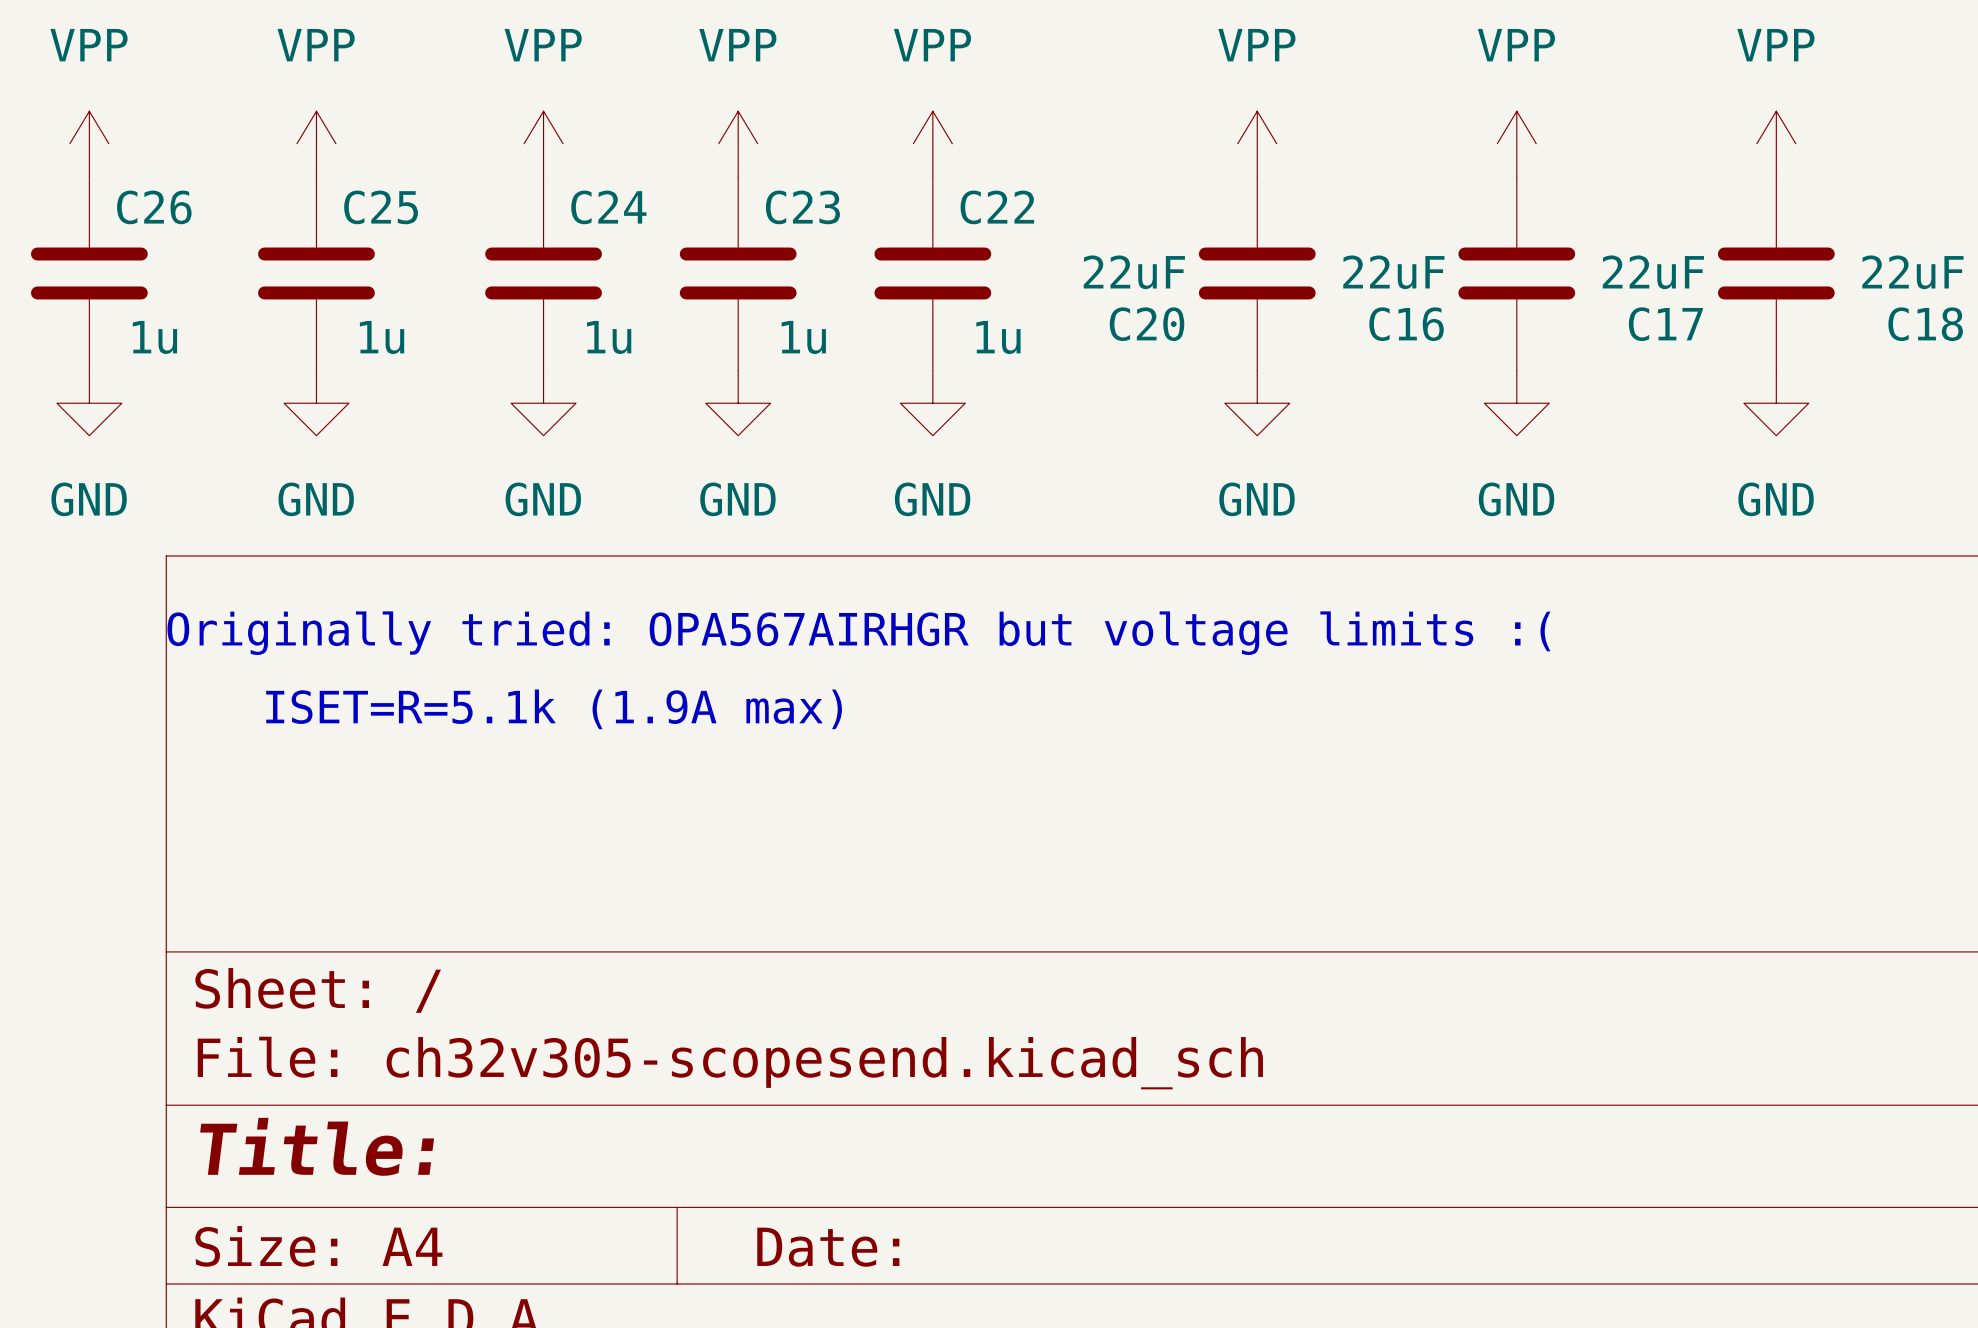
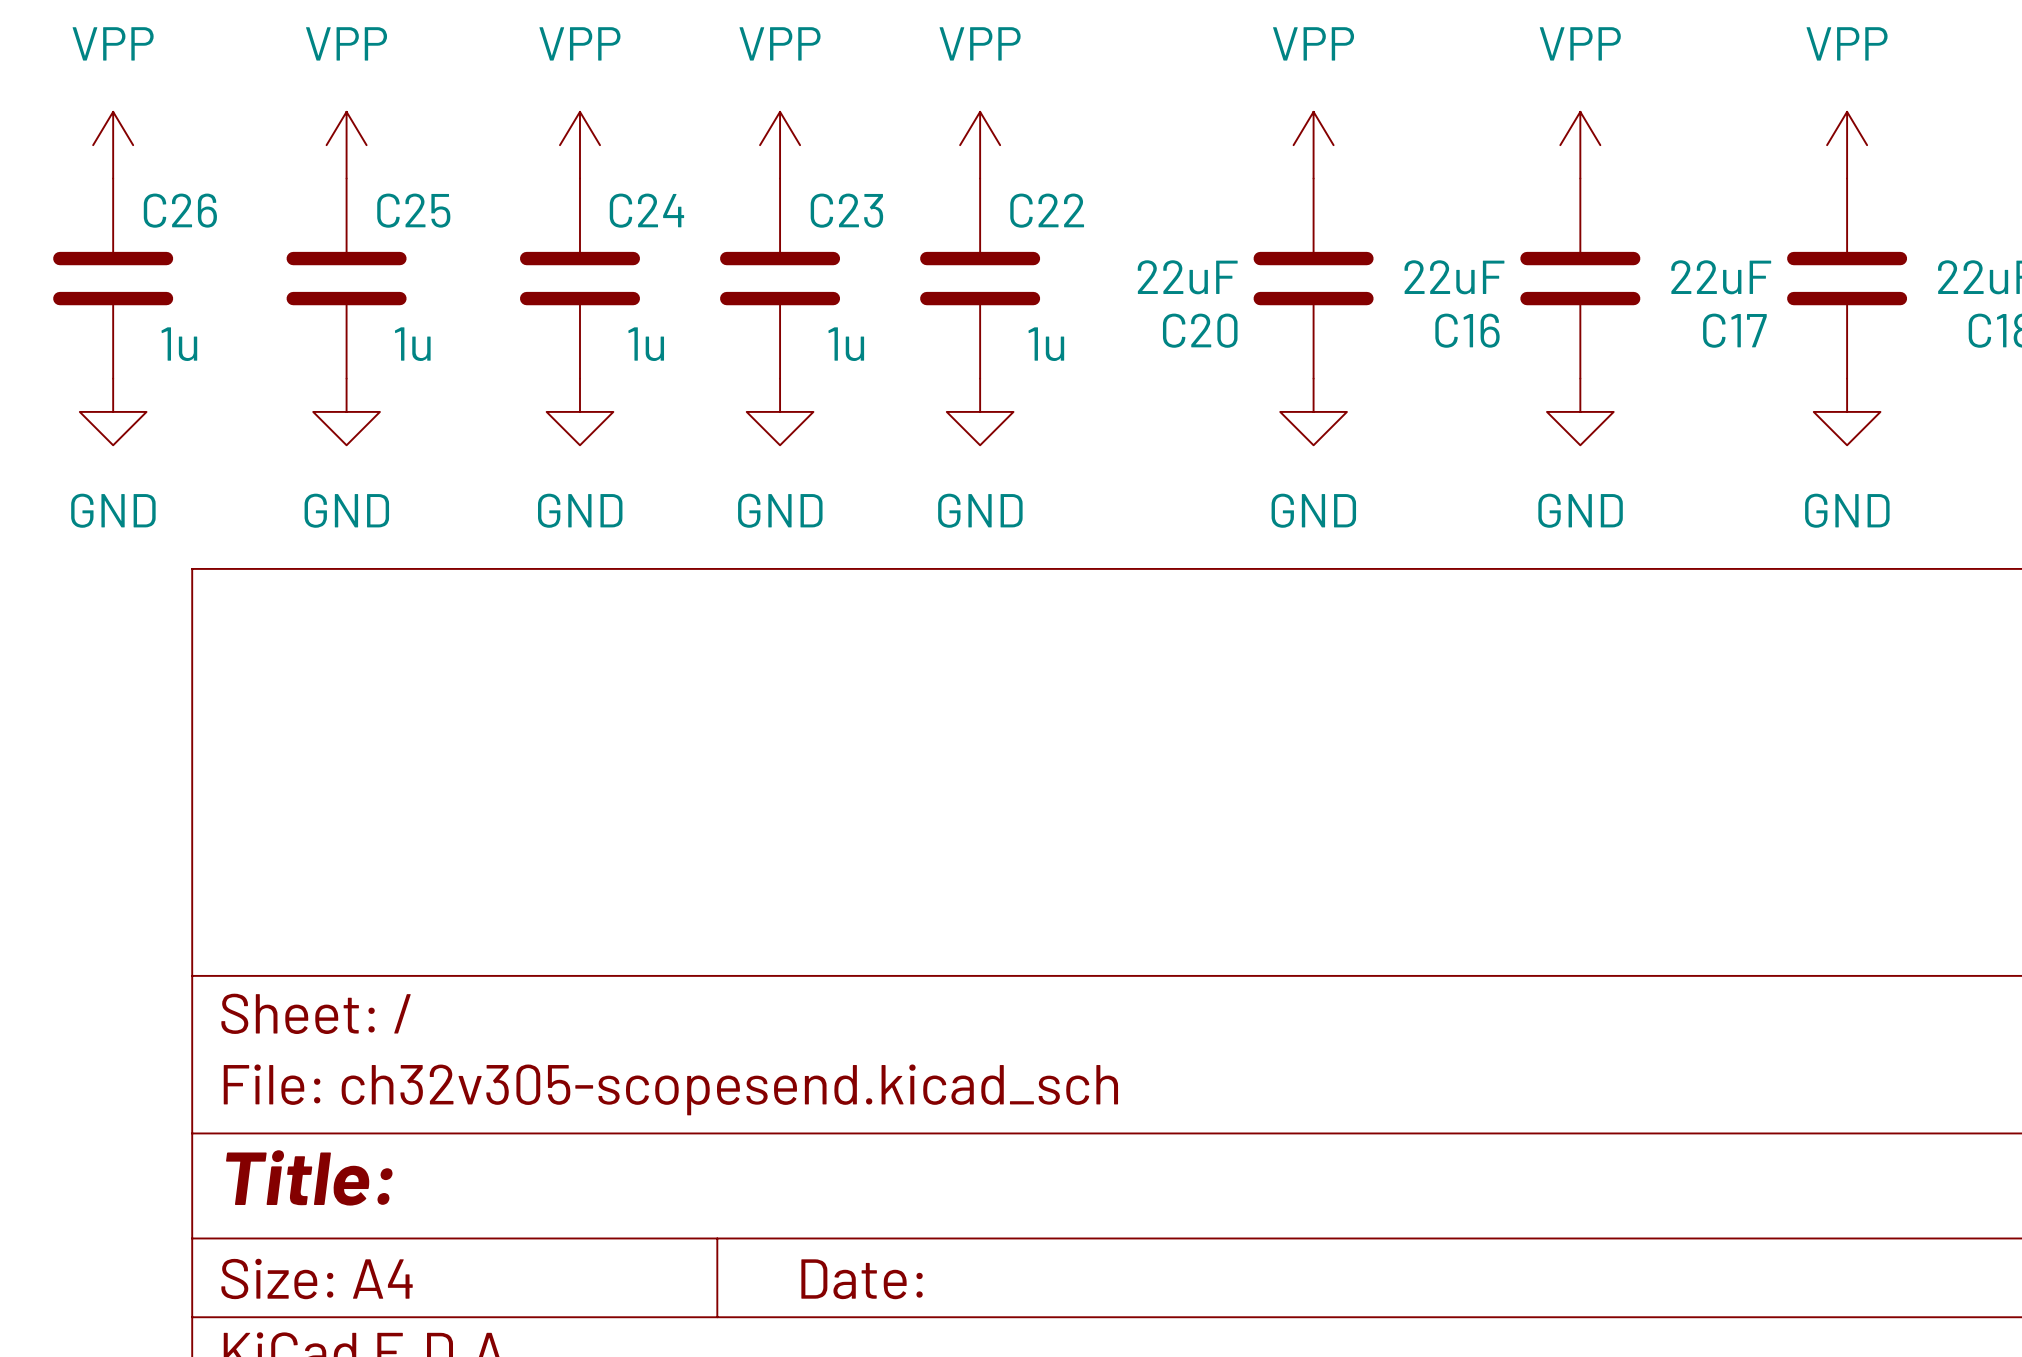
text: Originally tried: OPA567AIRHGR but voltage limits :( (858, 633) -> none
text: ISET=R=5.1k (1.9A max) (554, 709) -> none

